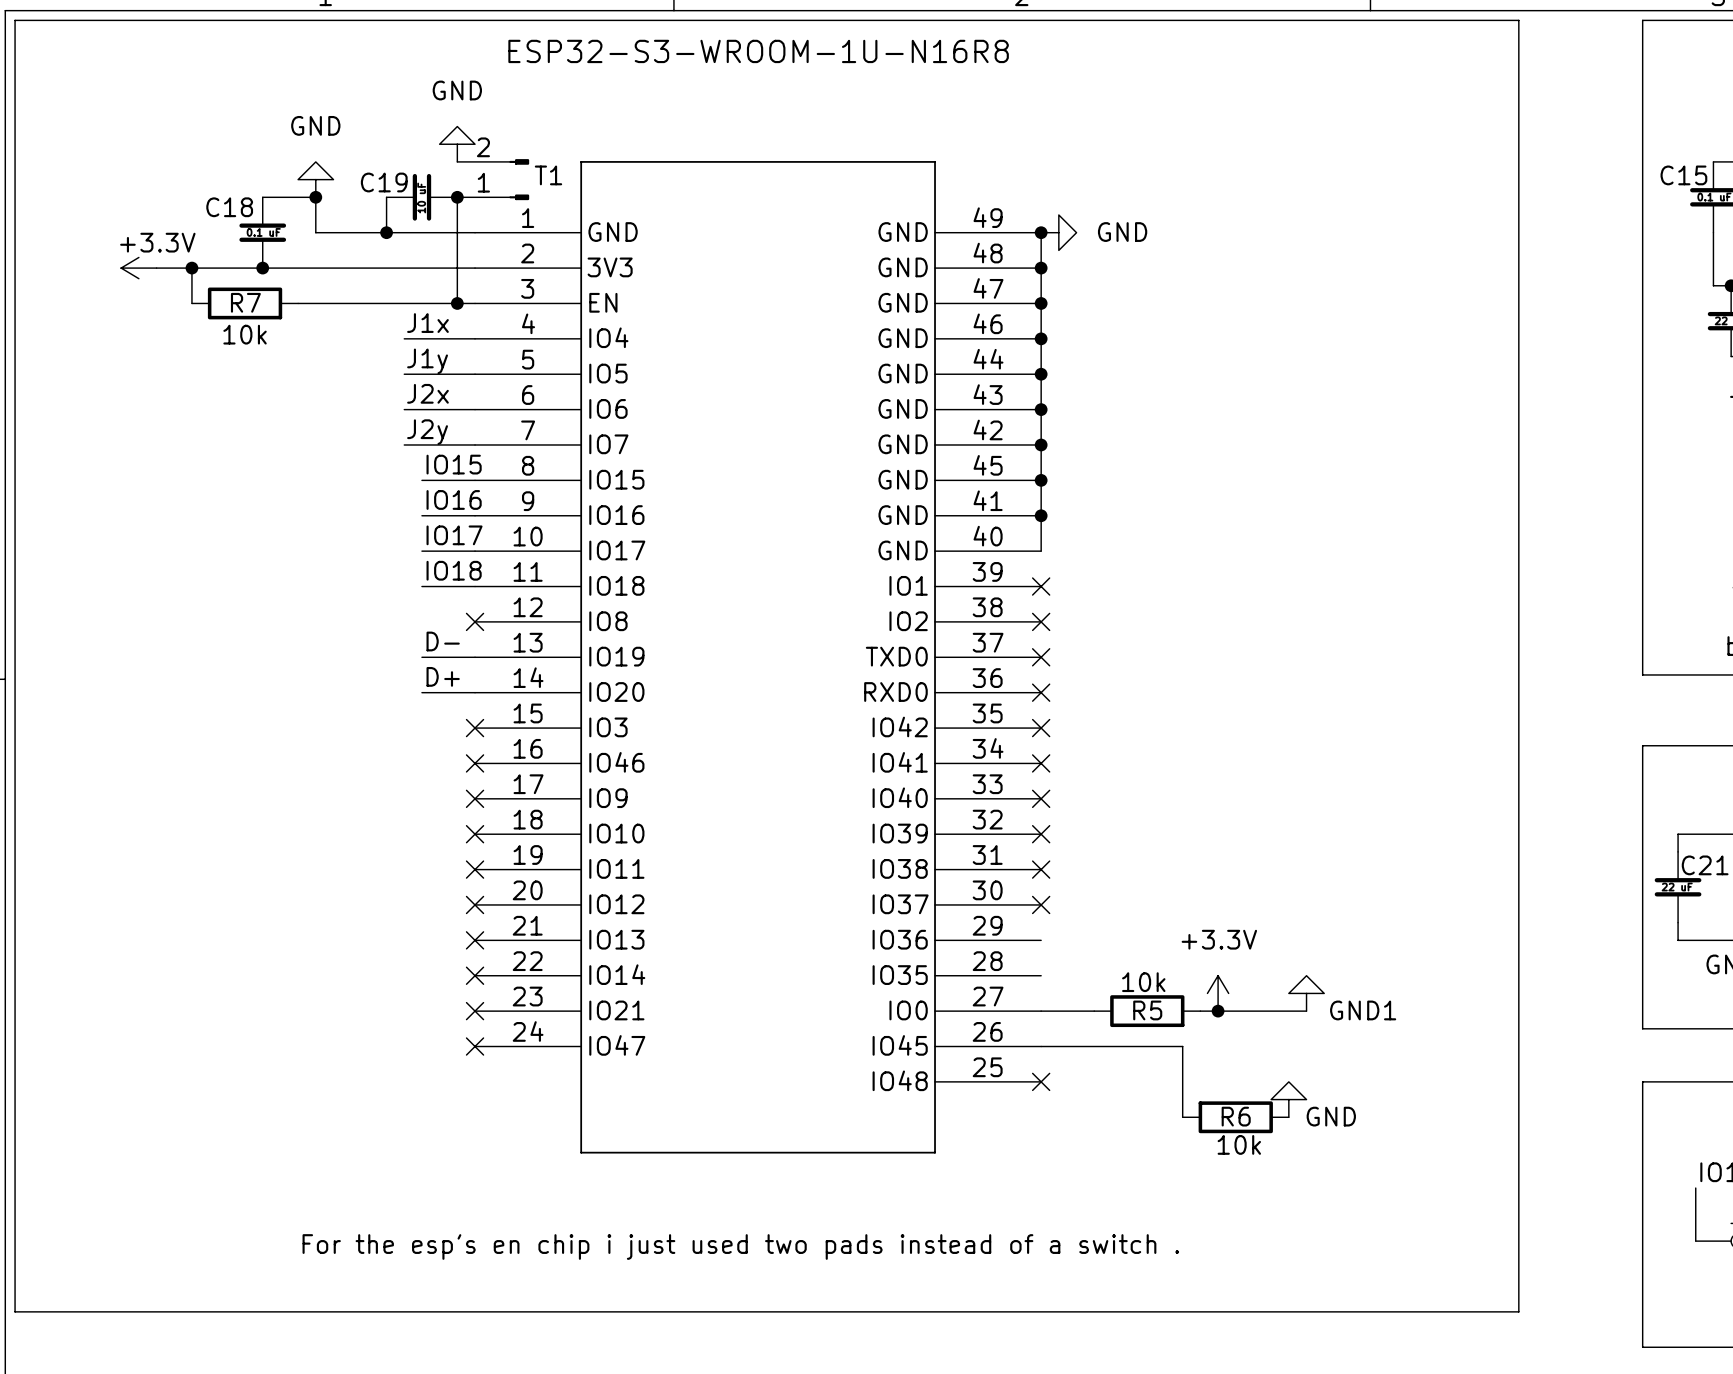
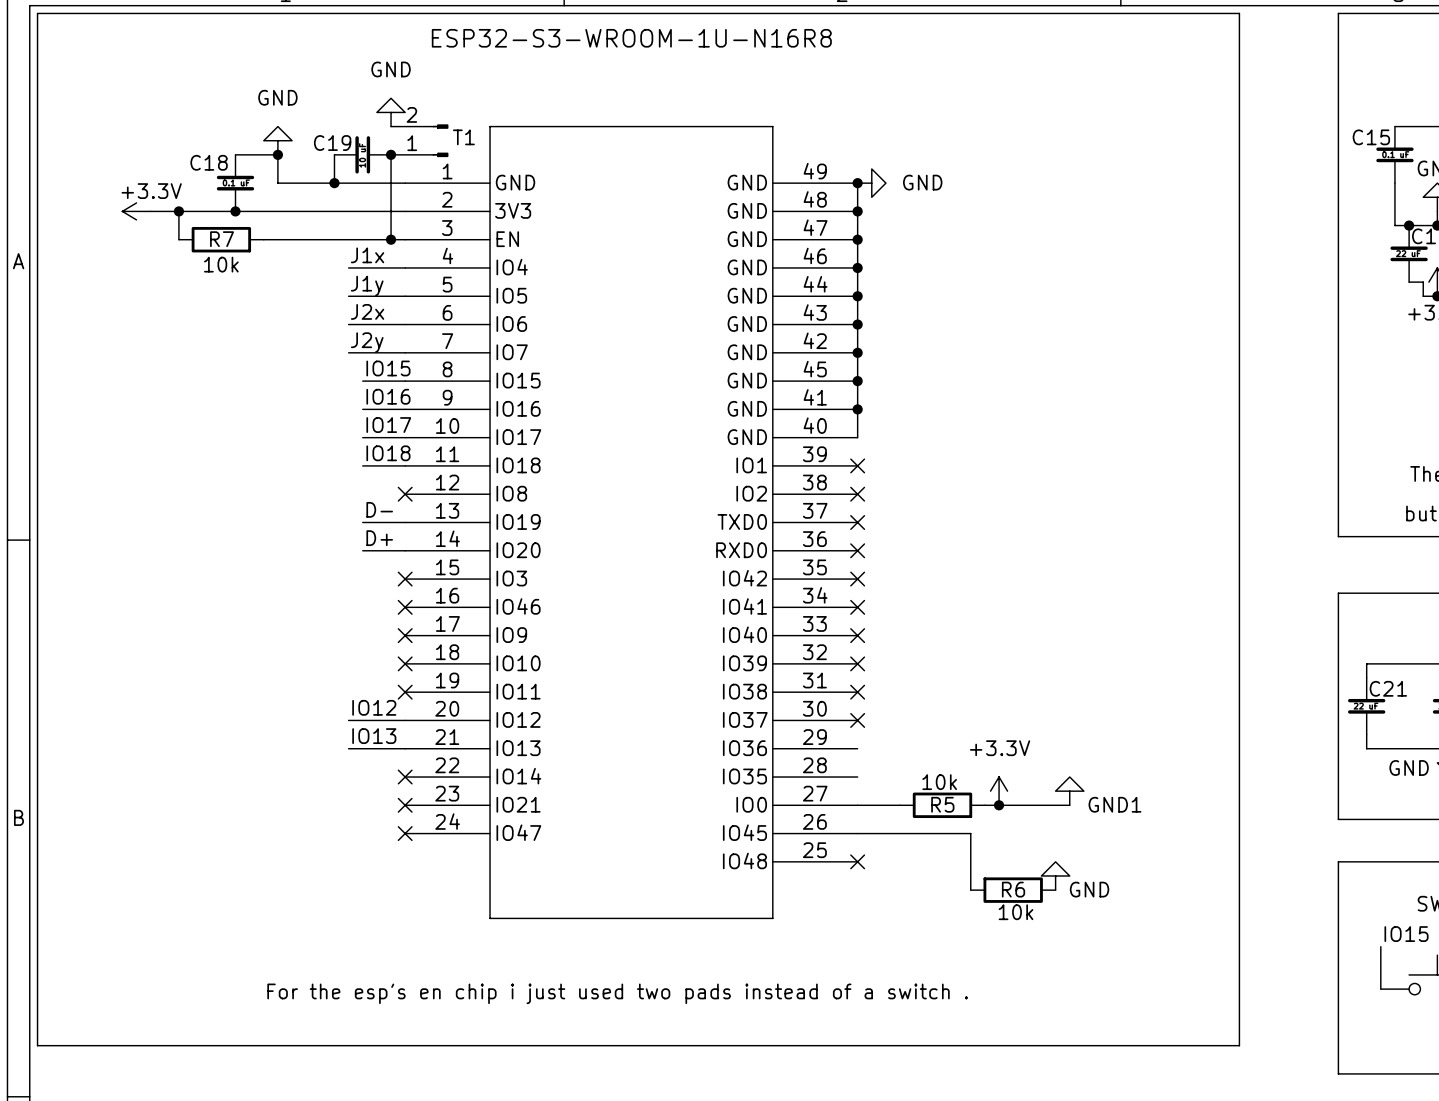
label: none -> IO12 (374, 707)
wire: none -> (348, 720) (405, 720)
no-connect mark: (475, 904) -> none
label: none -> IO13 (374, 736)
wire: none -> (348, 748) (405, 748)
no-connect mark: (475, 940) -> none

